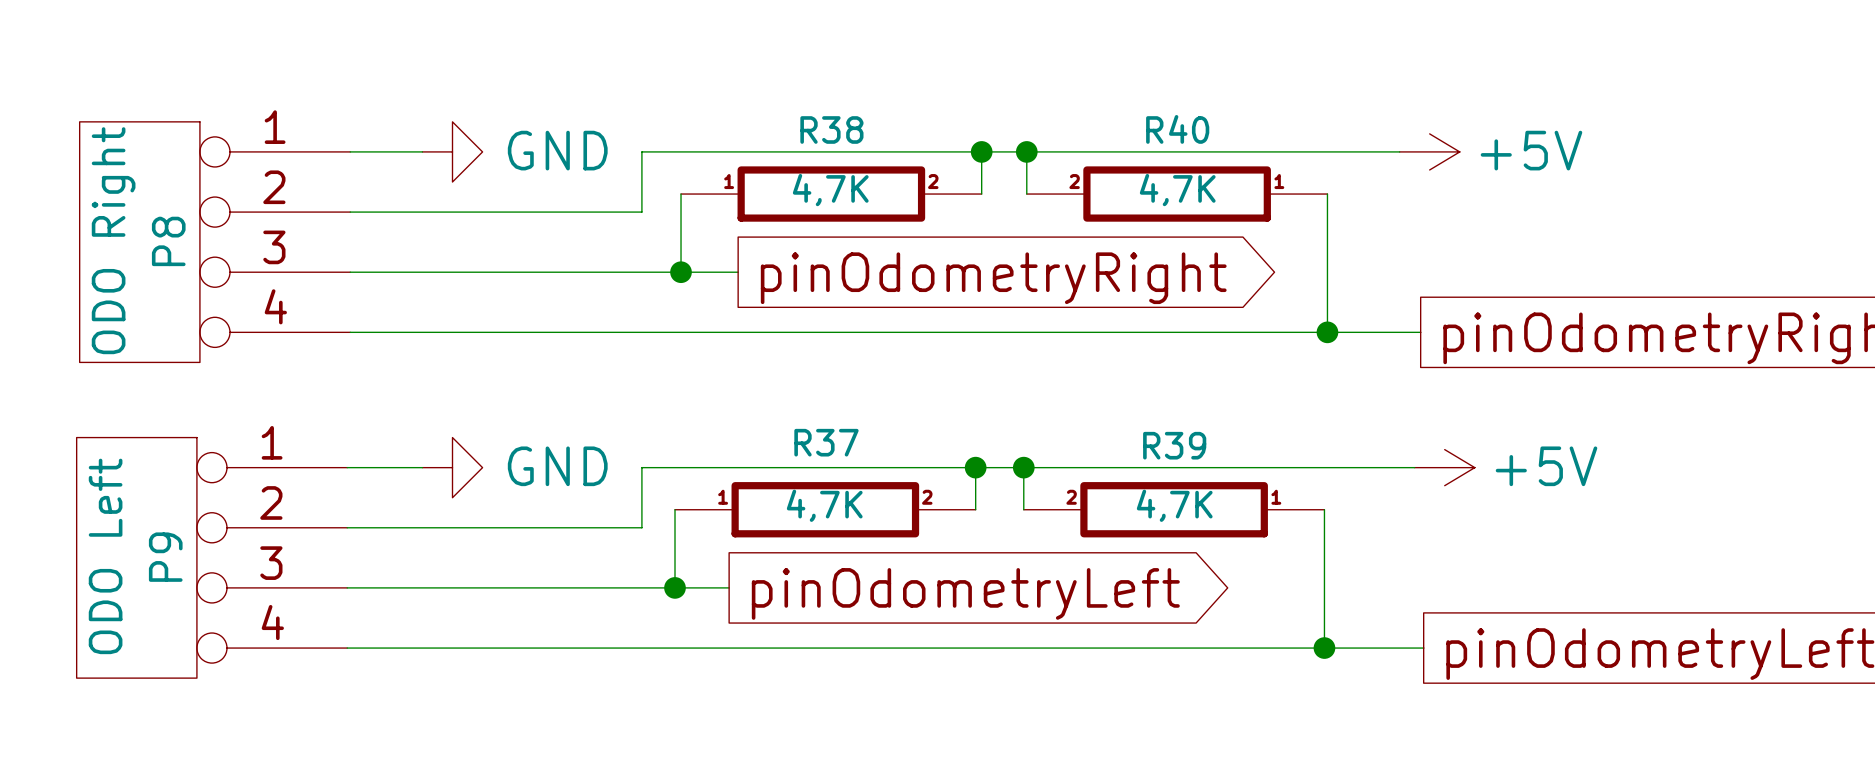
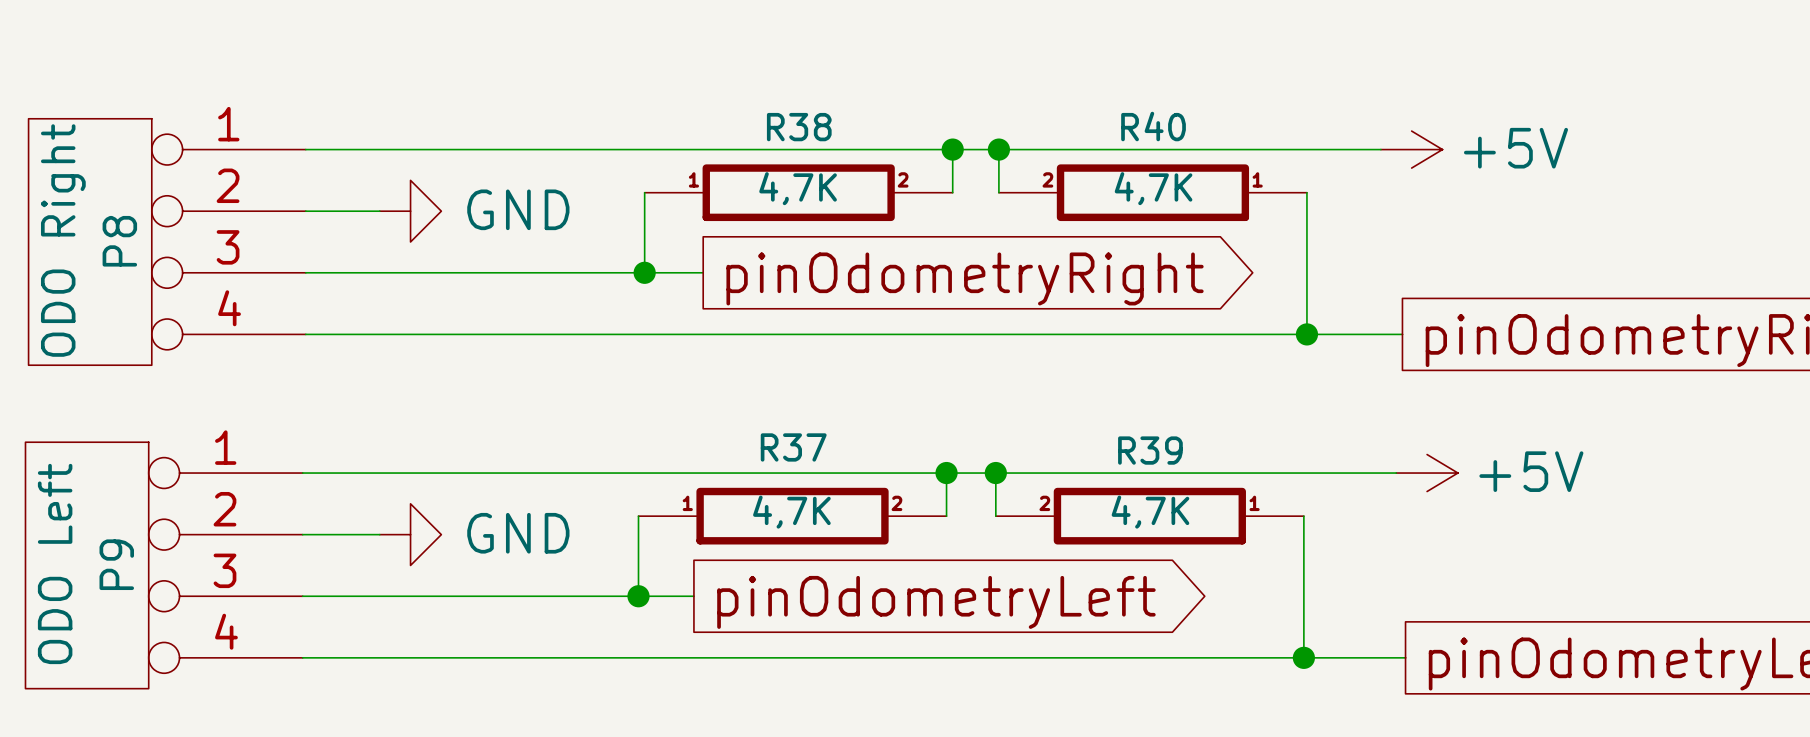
power symbol position: GND (452, 151) -> GND (410, 211)
wire: (641, 151) (641, 212) (422, 212) -> (604, 149) (379, 149)
power symbol position: GND (452, 467) -> GND (410, 534)
wire: (641, 467) (641, 527) (422, 527) -> (604, 473) (379, 473)

